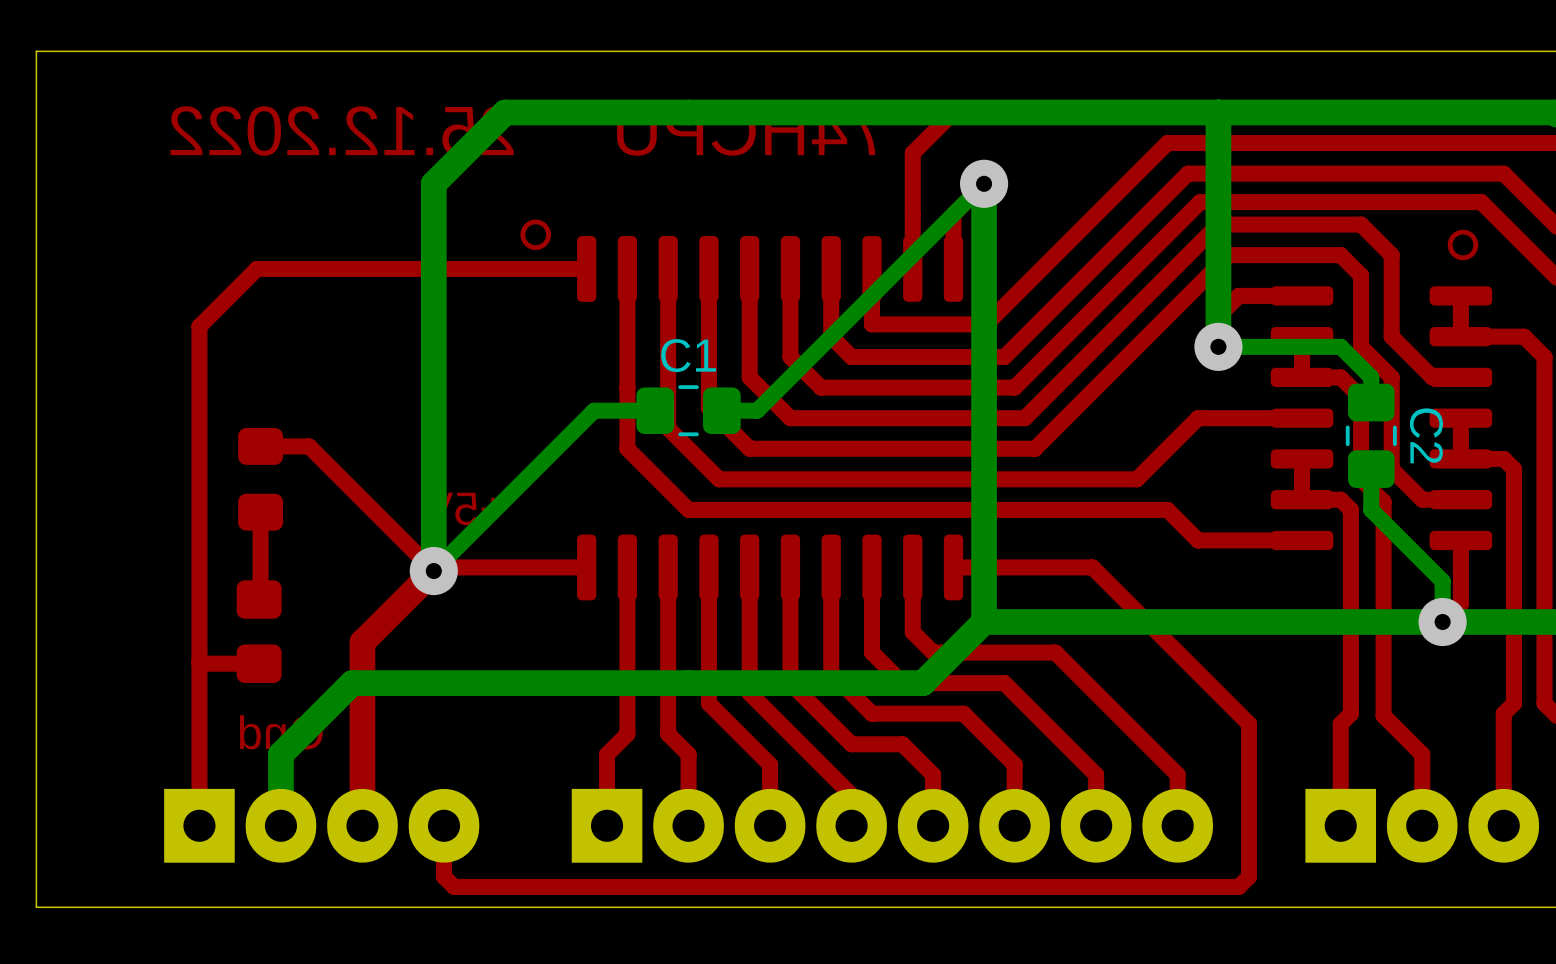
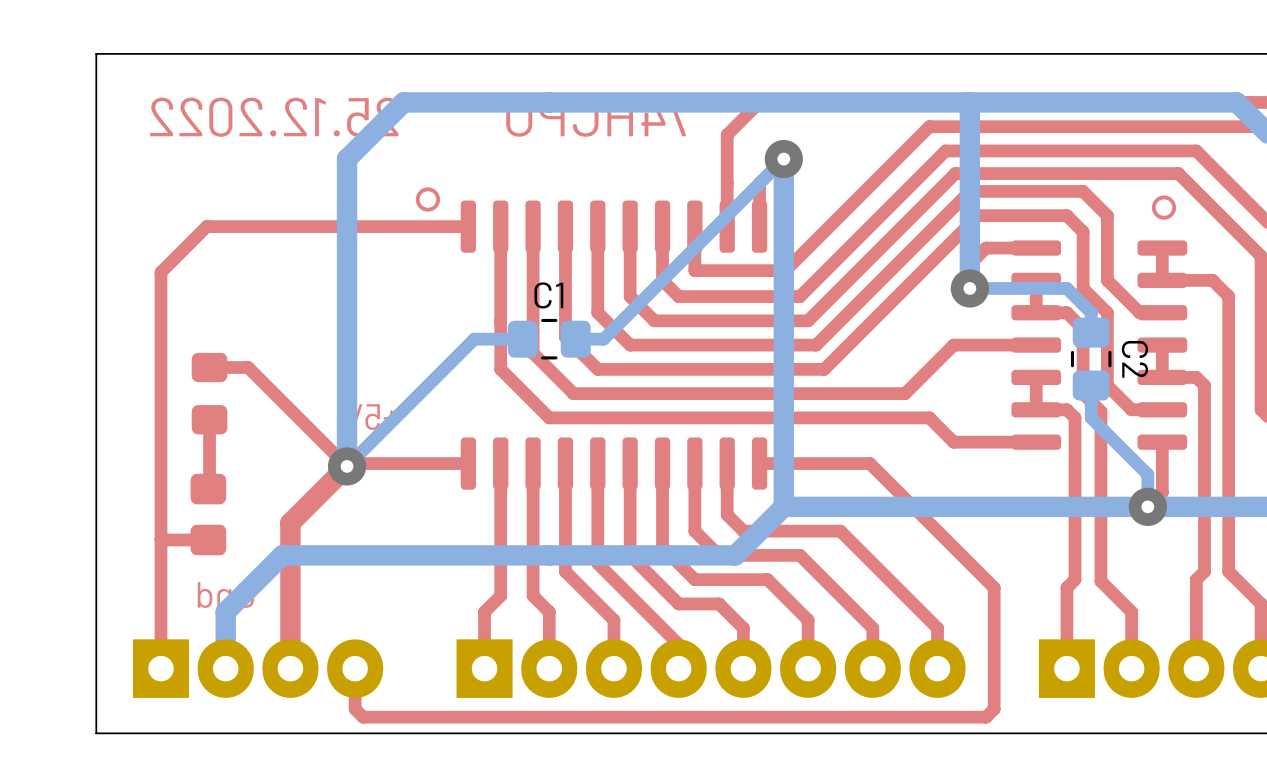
board edge: (117, 51) (36, 51) (36, 907) (117, 907) -> (96, 53) (96, 733)

